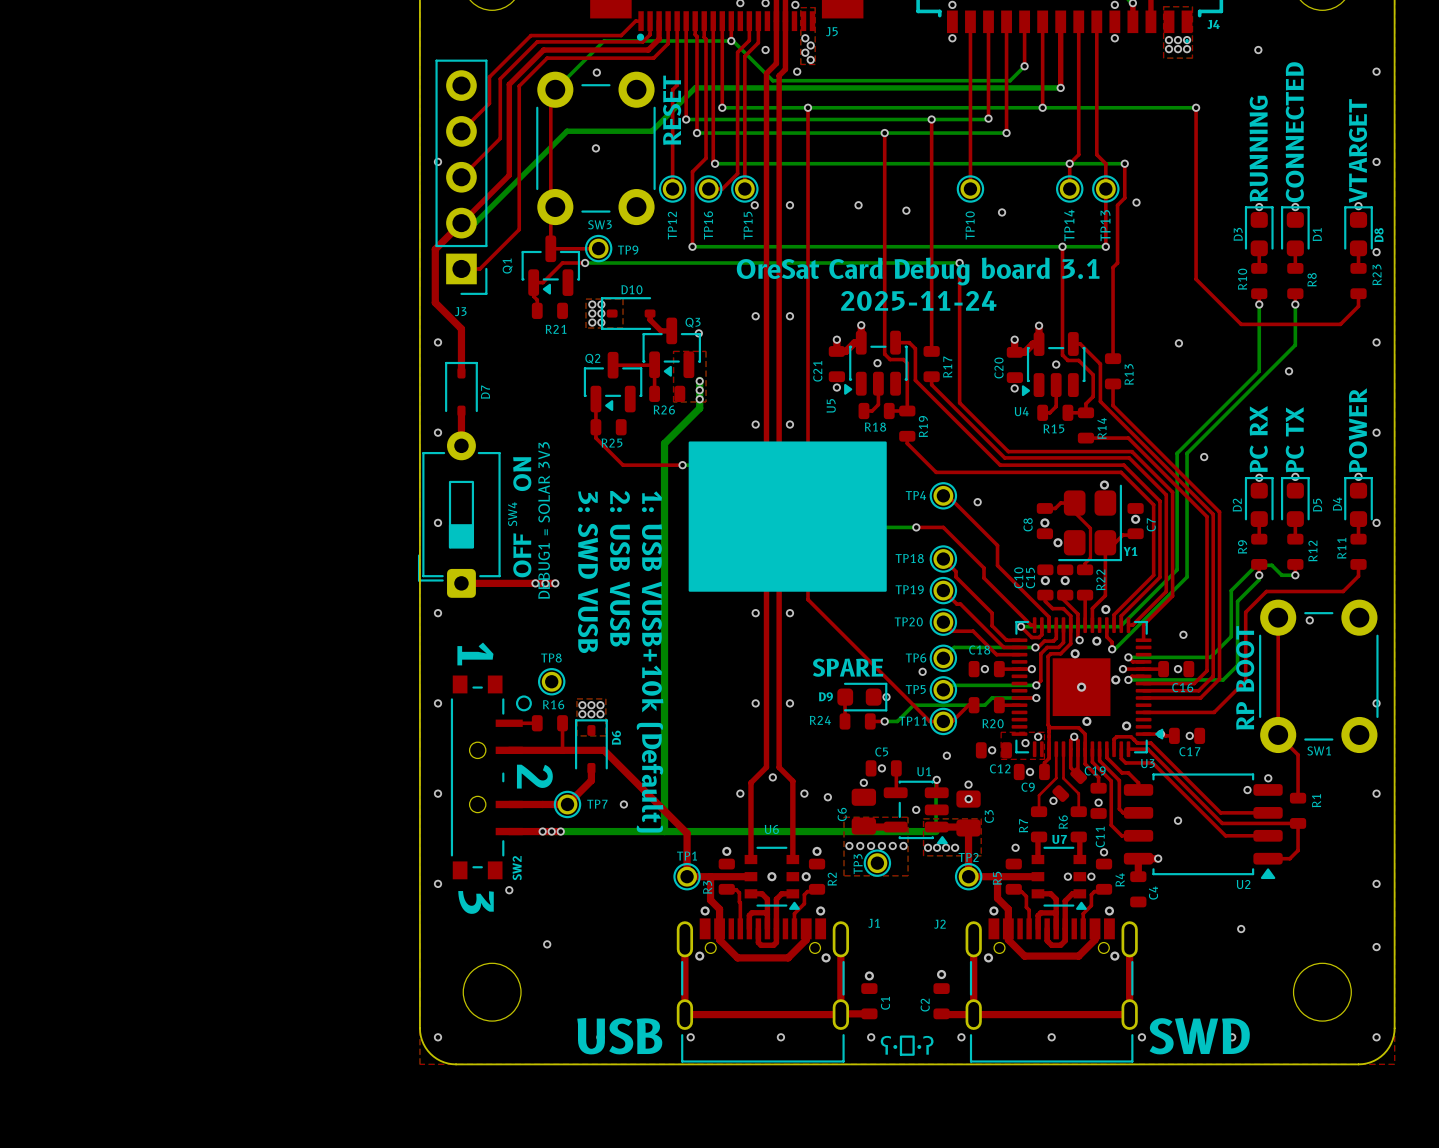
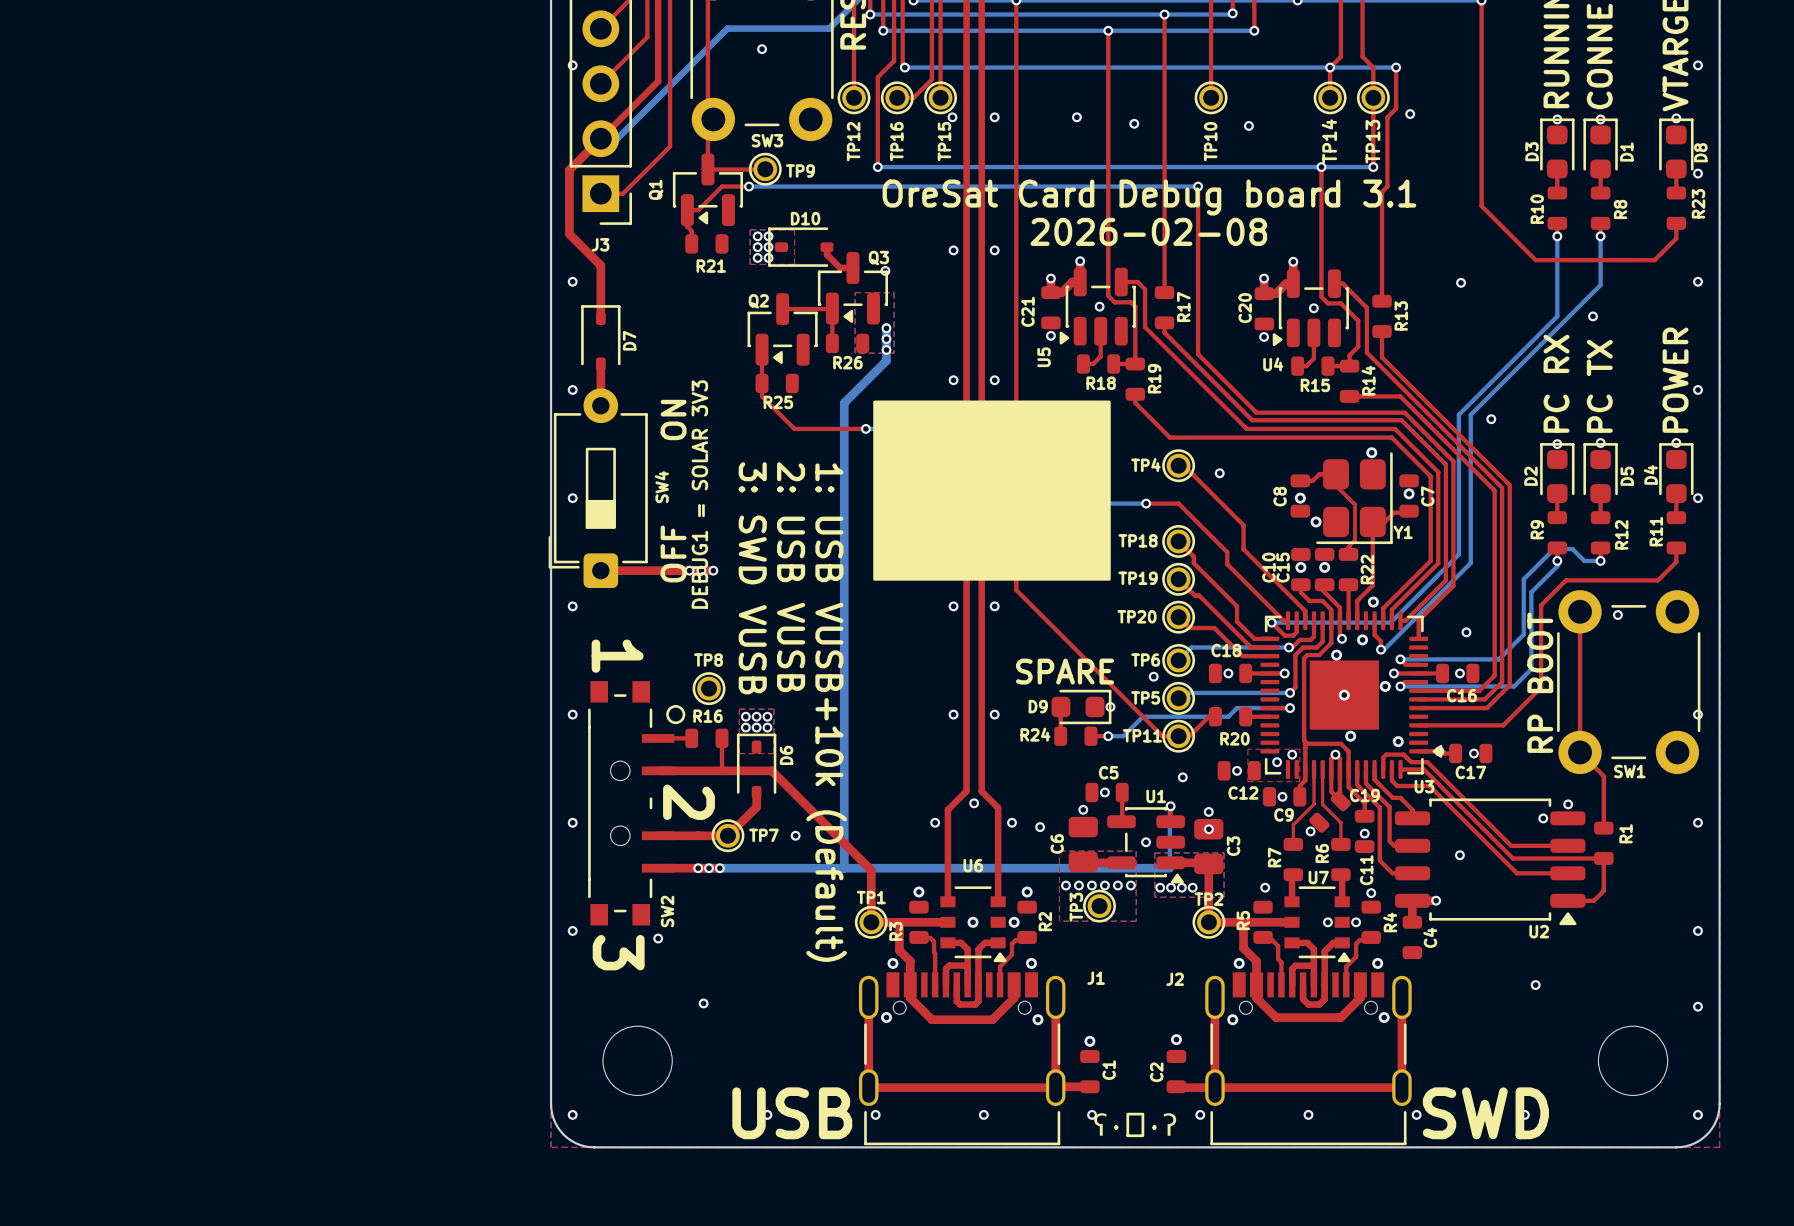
text: 2025-11-24 (918, 300) -> 2026-02-08 (1148, 231)

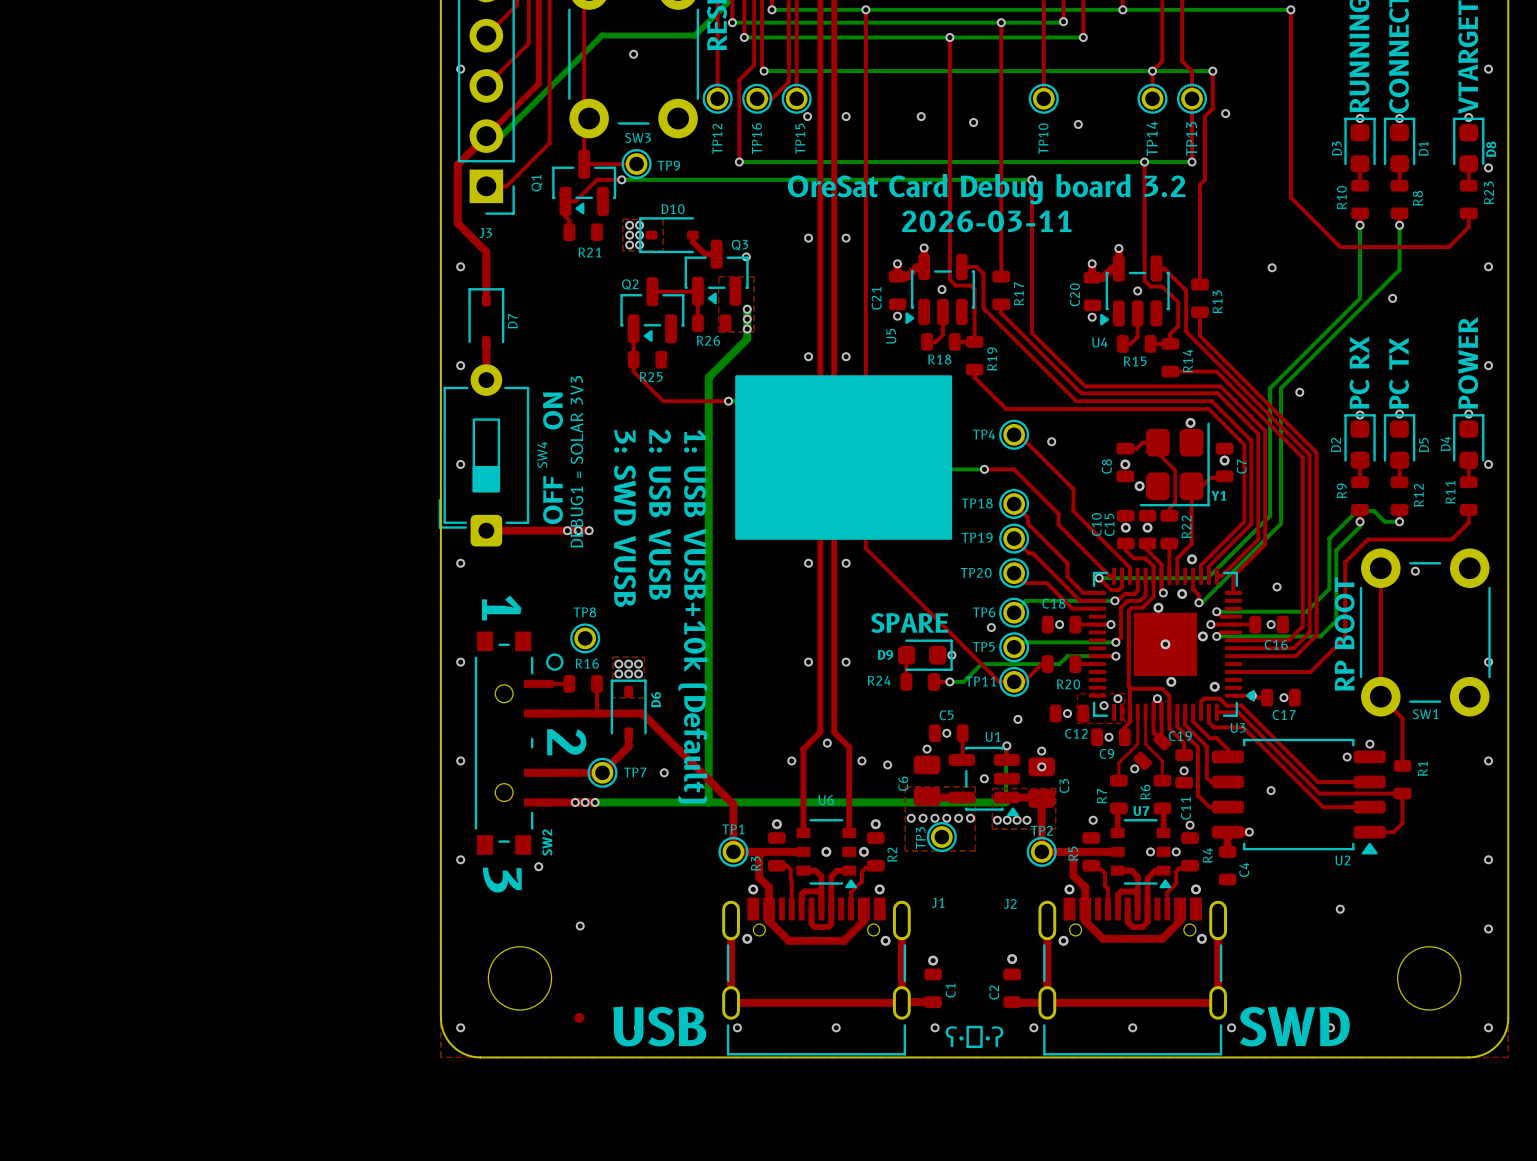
text: OreSat Card Debug board 3.1 (1149, 197) -> OreSat Card Debug board 3.2 (986, 189)
text: 2026-02-08 (1148, 231) -> 2026-03-11 (986, 221)
SW2 footprint: [588, 681, 686, 926] -> [474, 631, 564, 855]
part: none -> (579, 1017)

